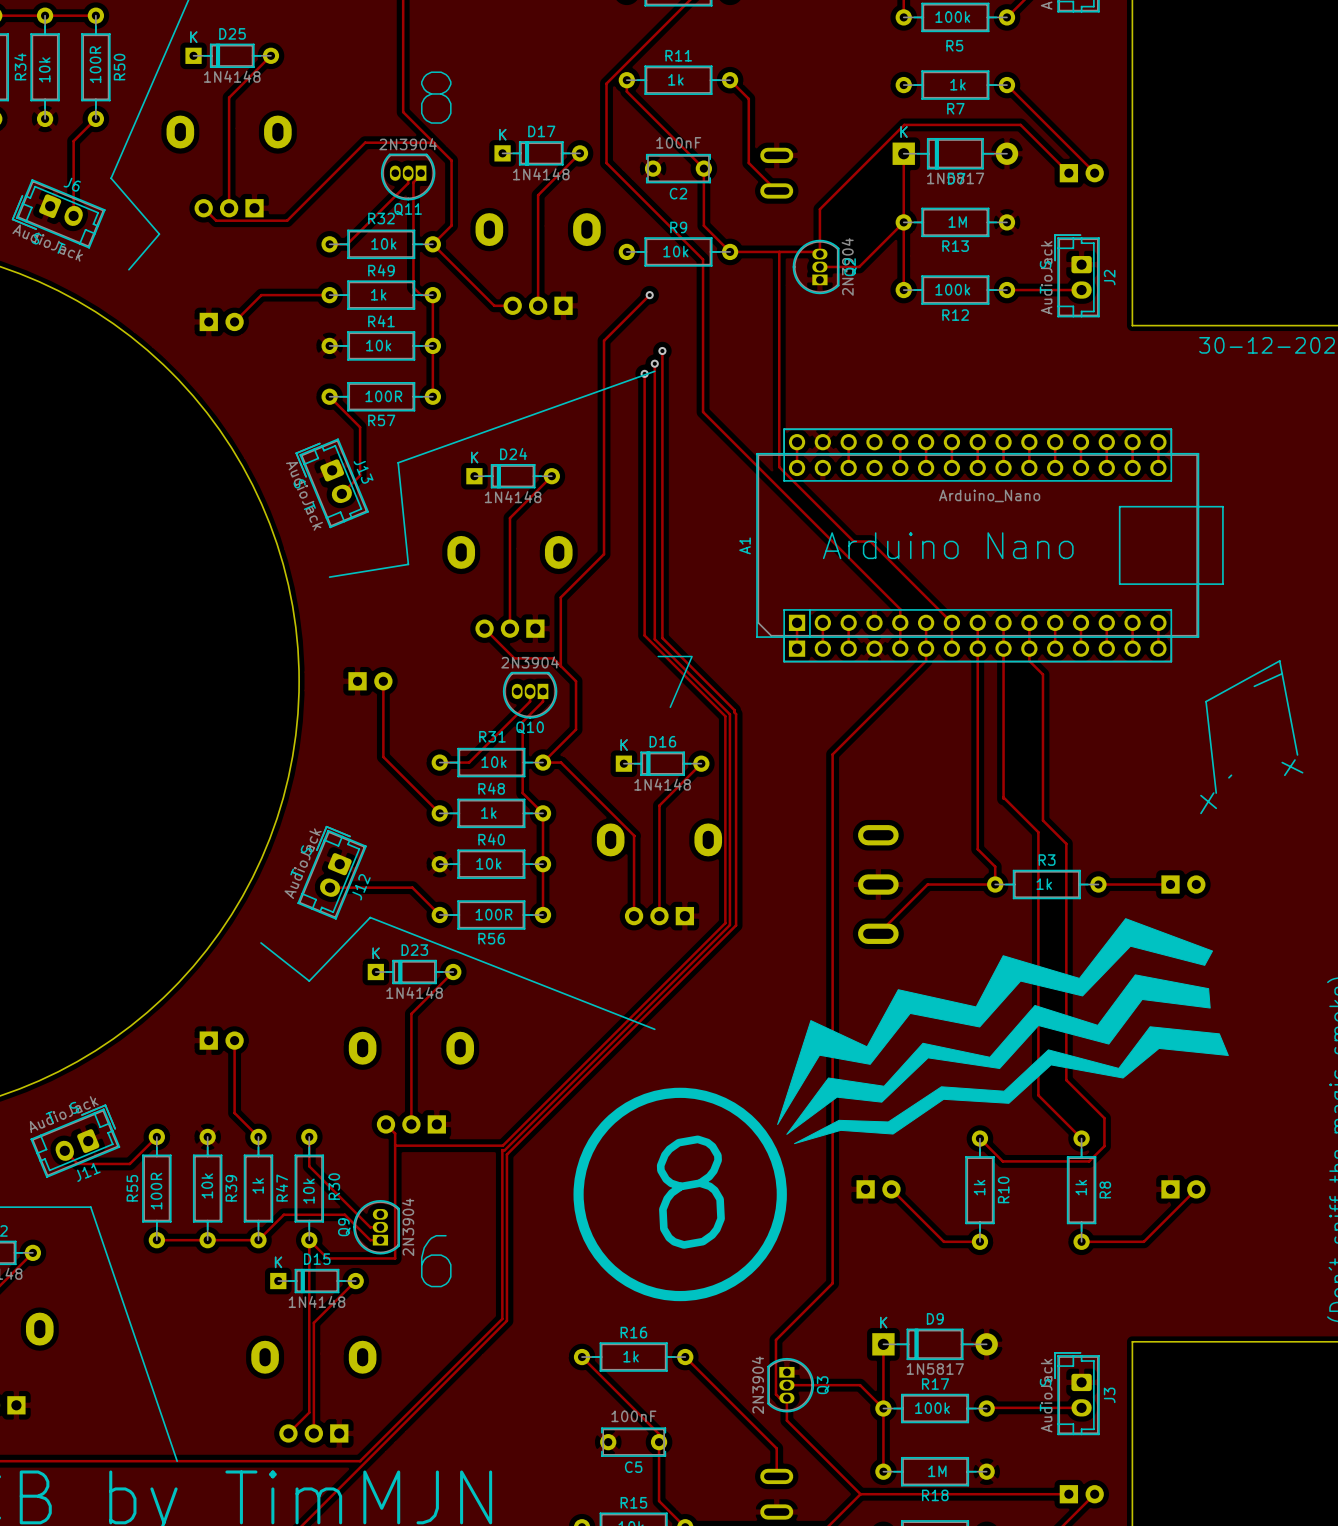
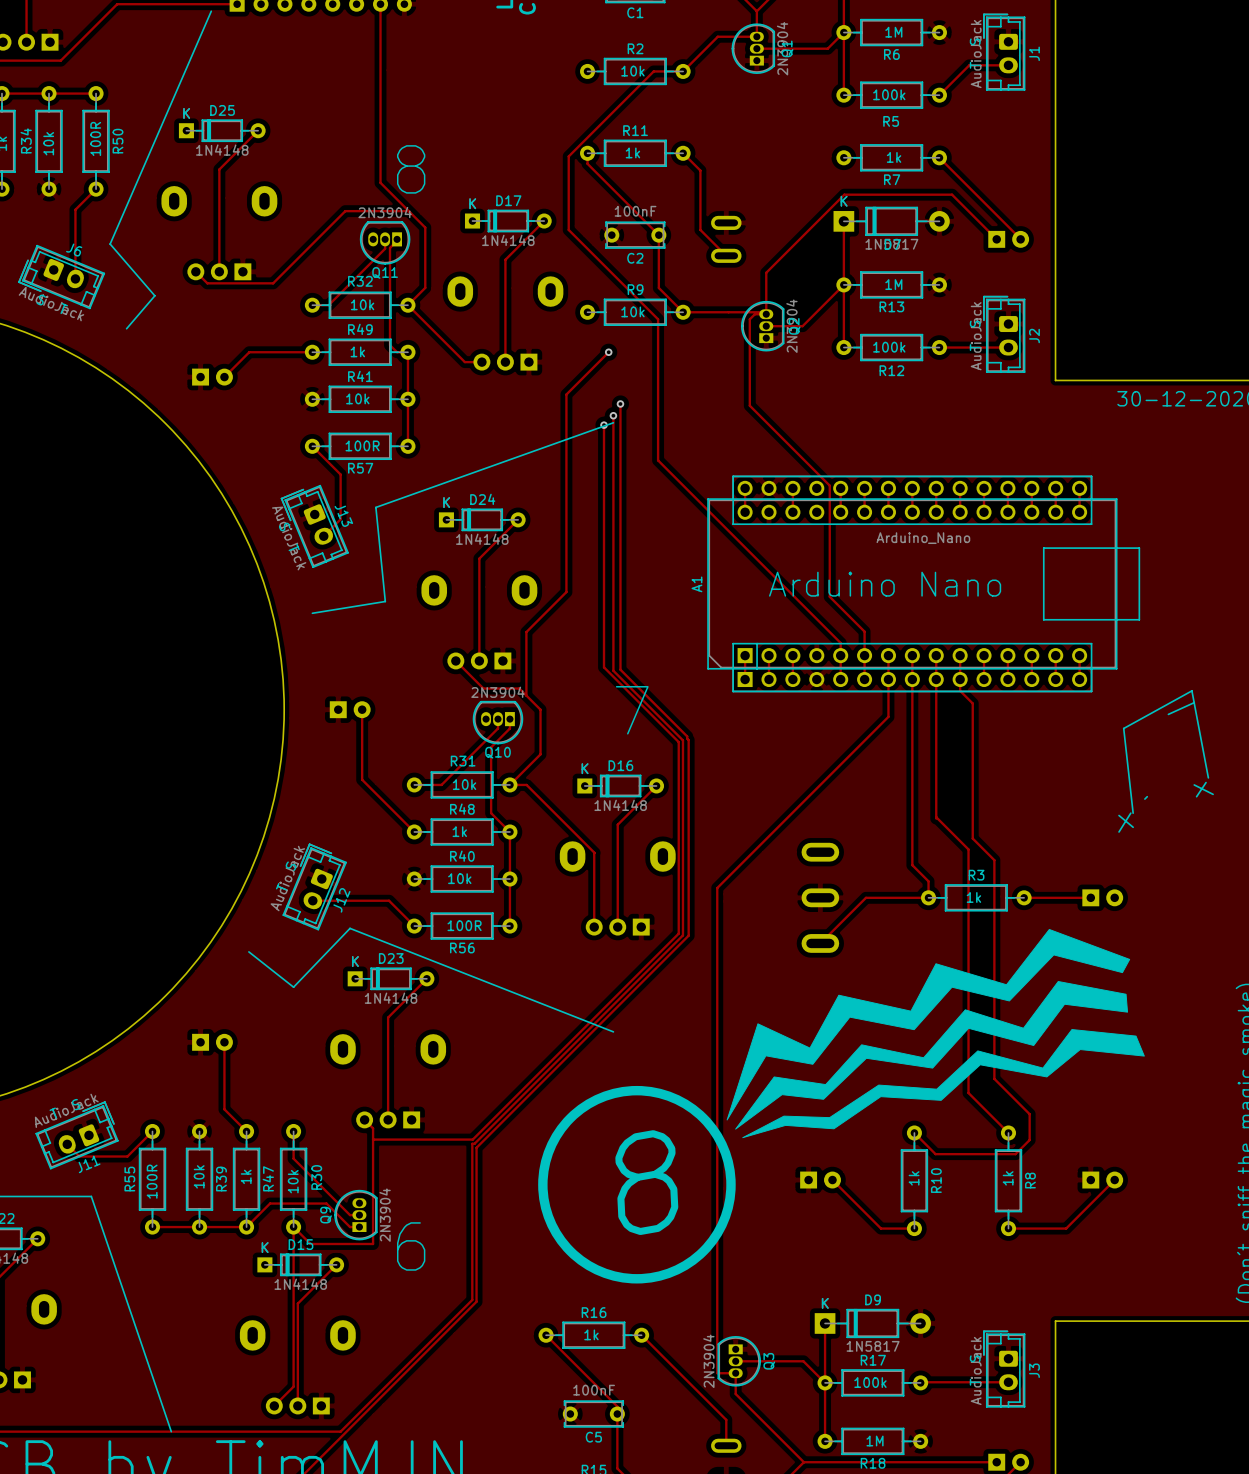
track: (779, 251) (779, 467) (853, 541) (870, 541) (951, 622) -> none
track: none -> (766, 314) (754, 314) (749, 319) (749, 405) (829, 485) (829, 596) (864, 631) (864, 655)
track: (926, 648) (926, 660) (832, 754) (832, 1283) (775, 1340) (775, 1394) (779, 1398) -> (888, 679) (888, 716) (717, 888) (717, 1373) (729, 1373)

